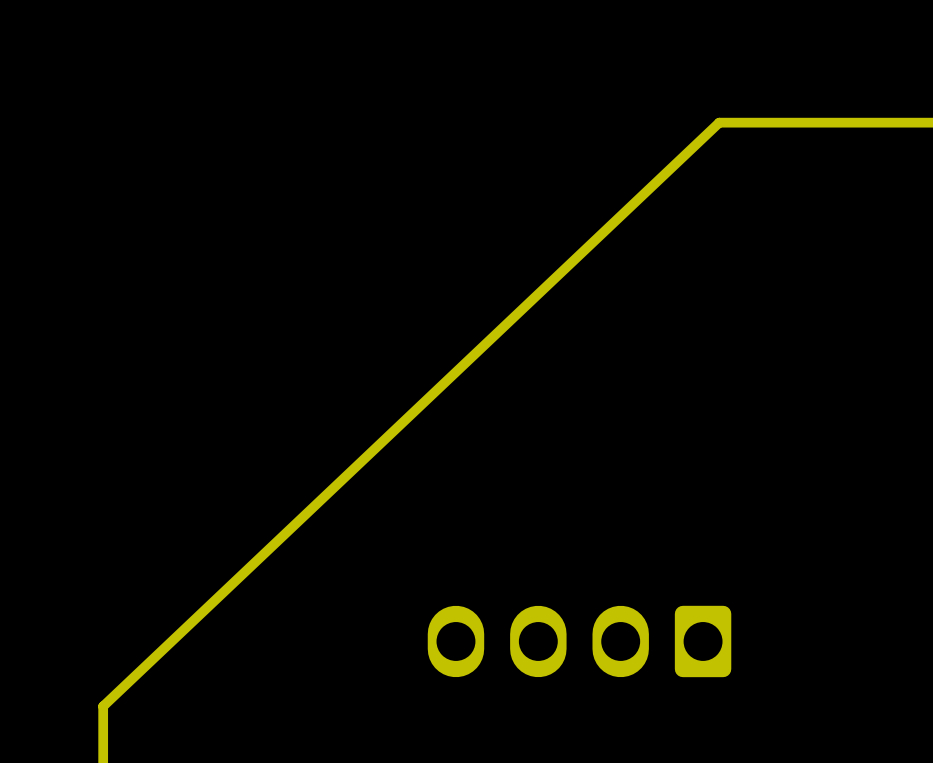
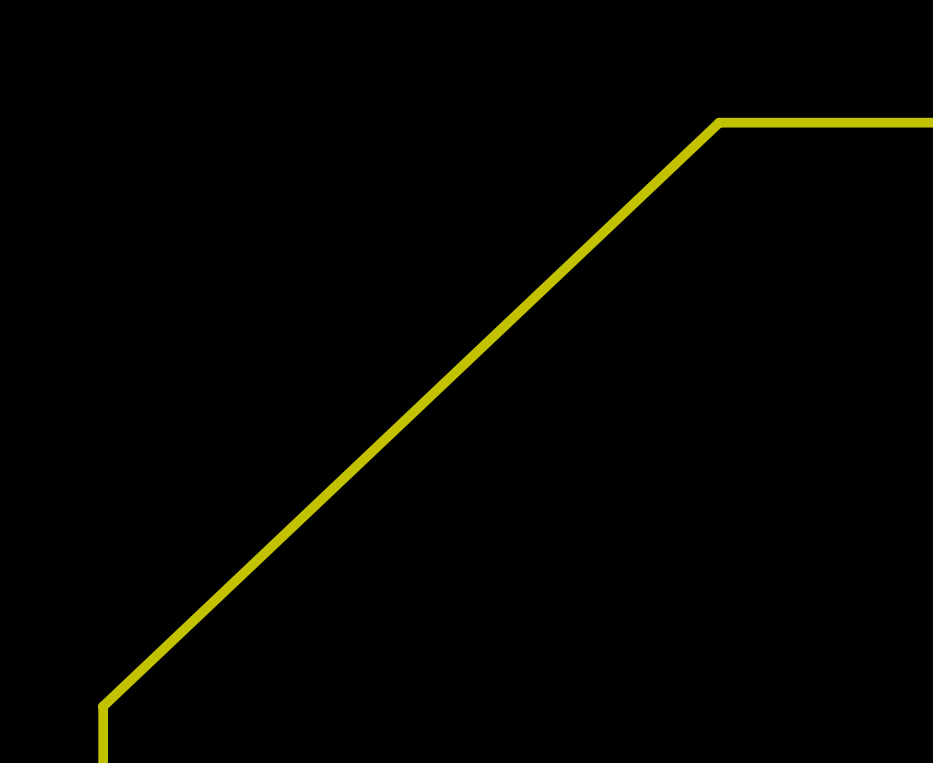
part: (579, 641) -> none

